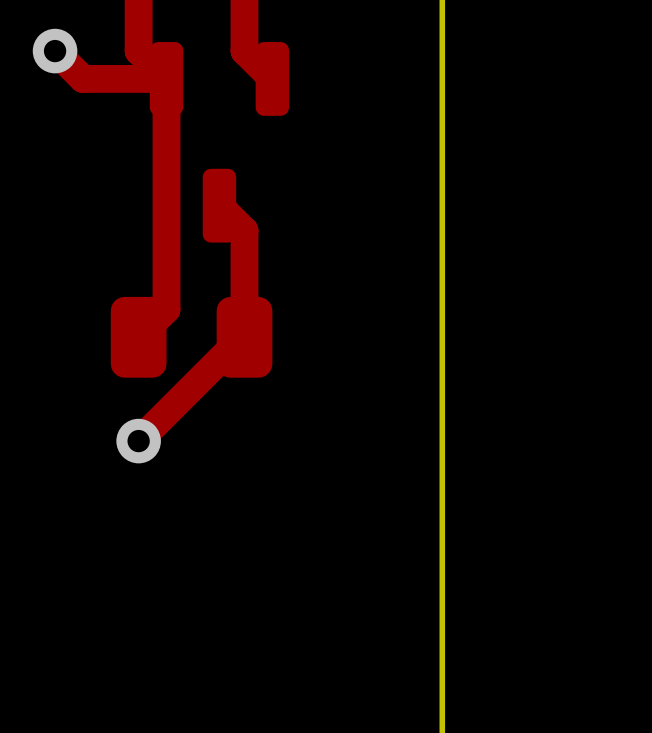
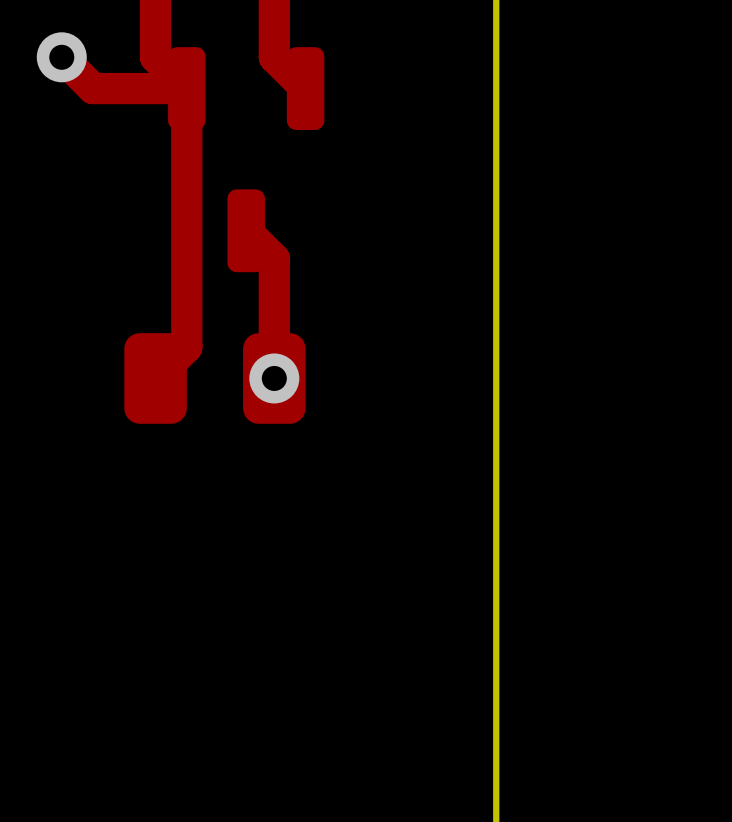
top track: (244, 337) (138, 441) -> none
via position: (138, 441) -> (274, 378)

